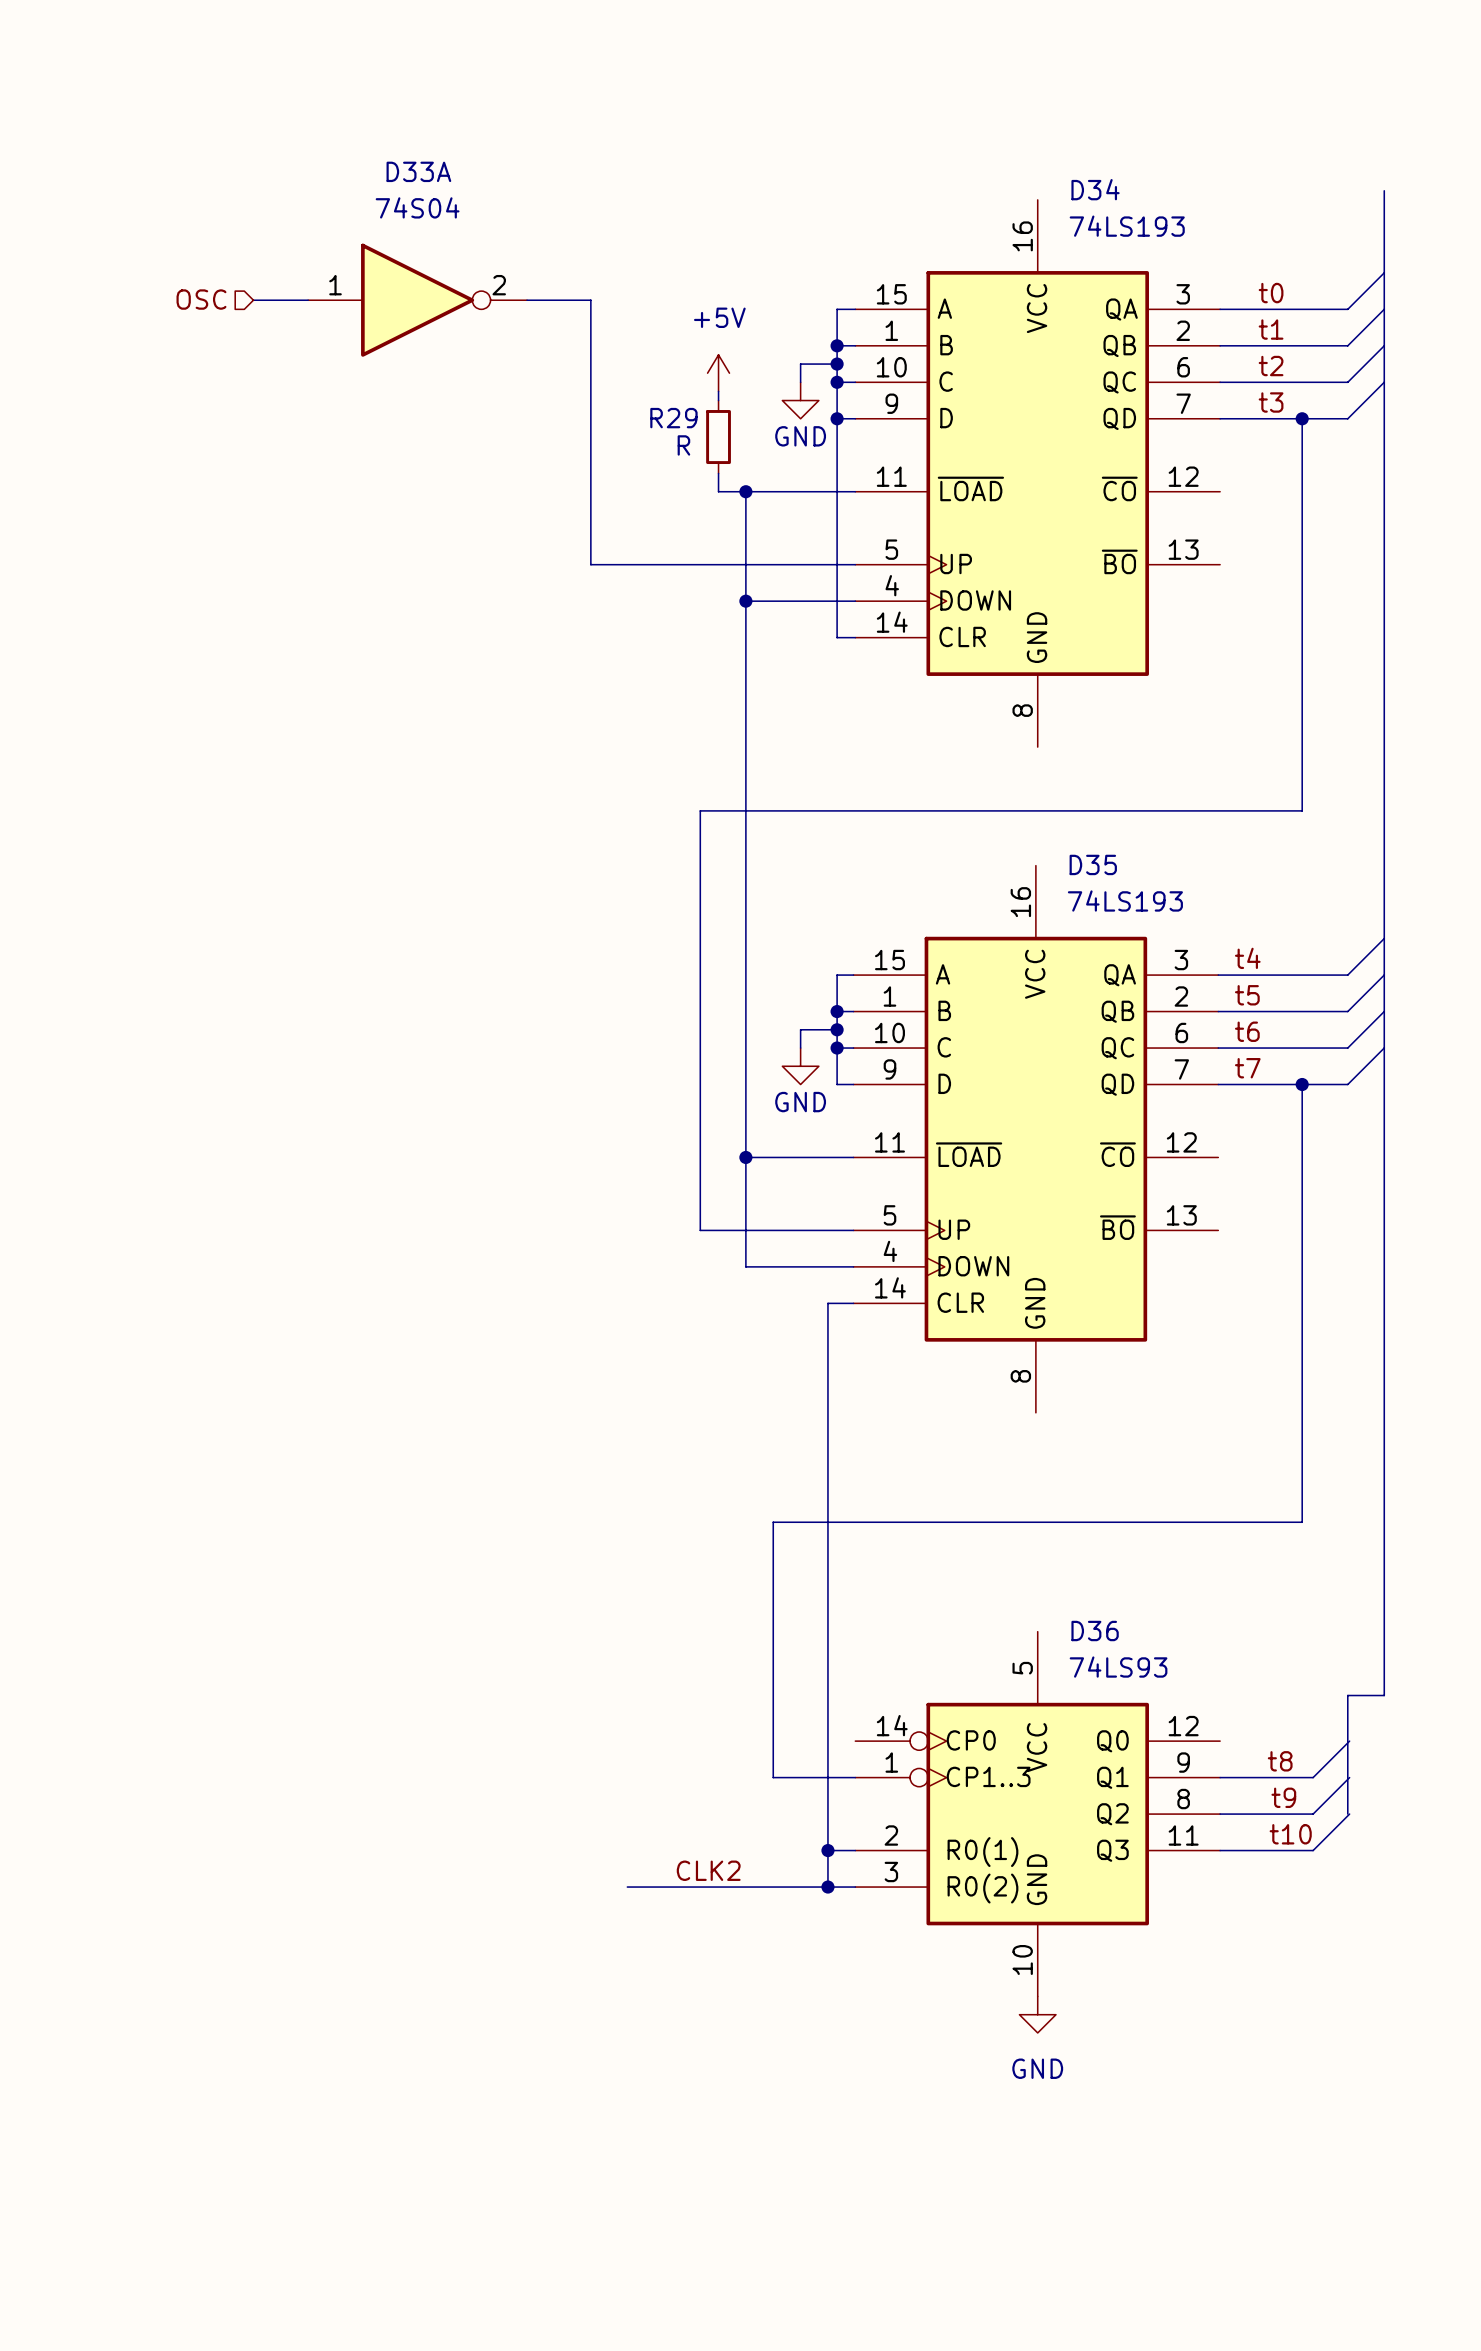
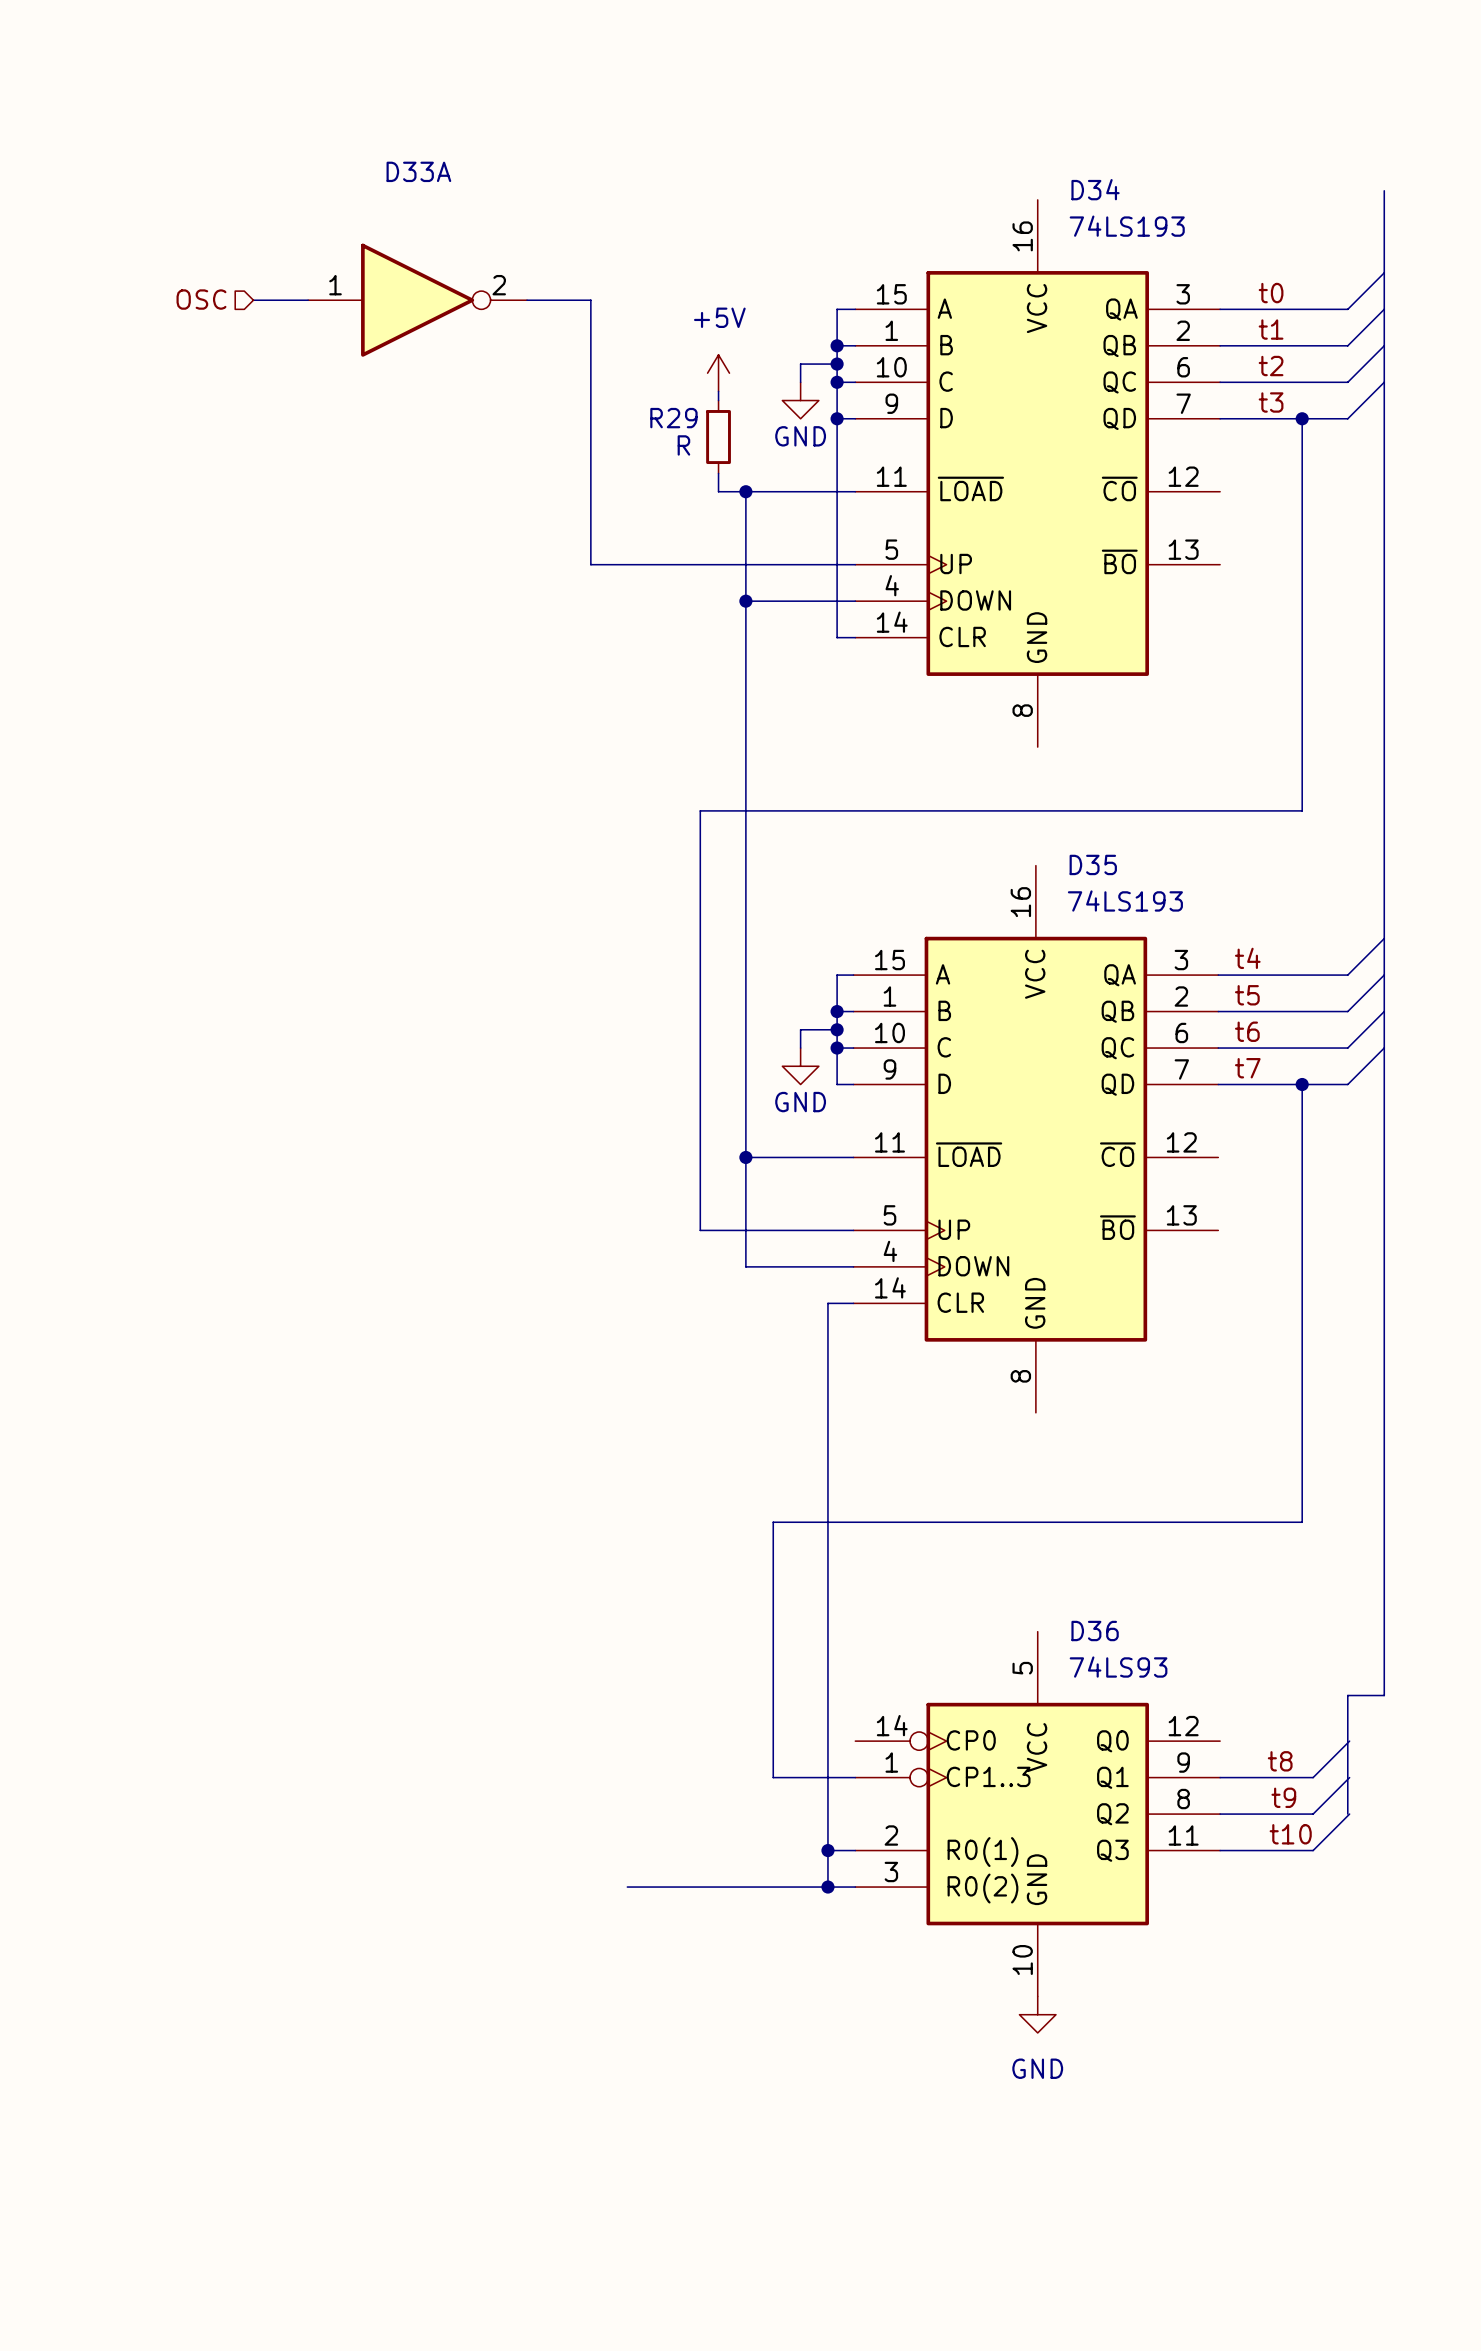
D33A value: 74S04 (417, 207) -> none
label: CLK2 (708, 1870) -> none

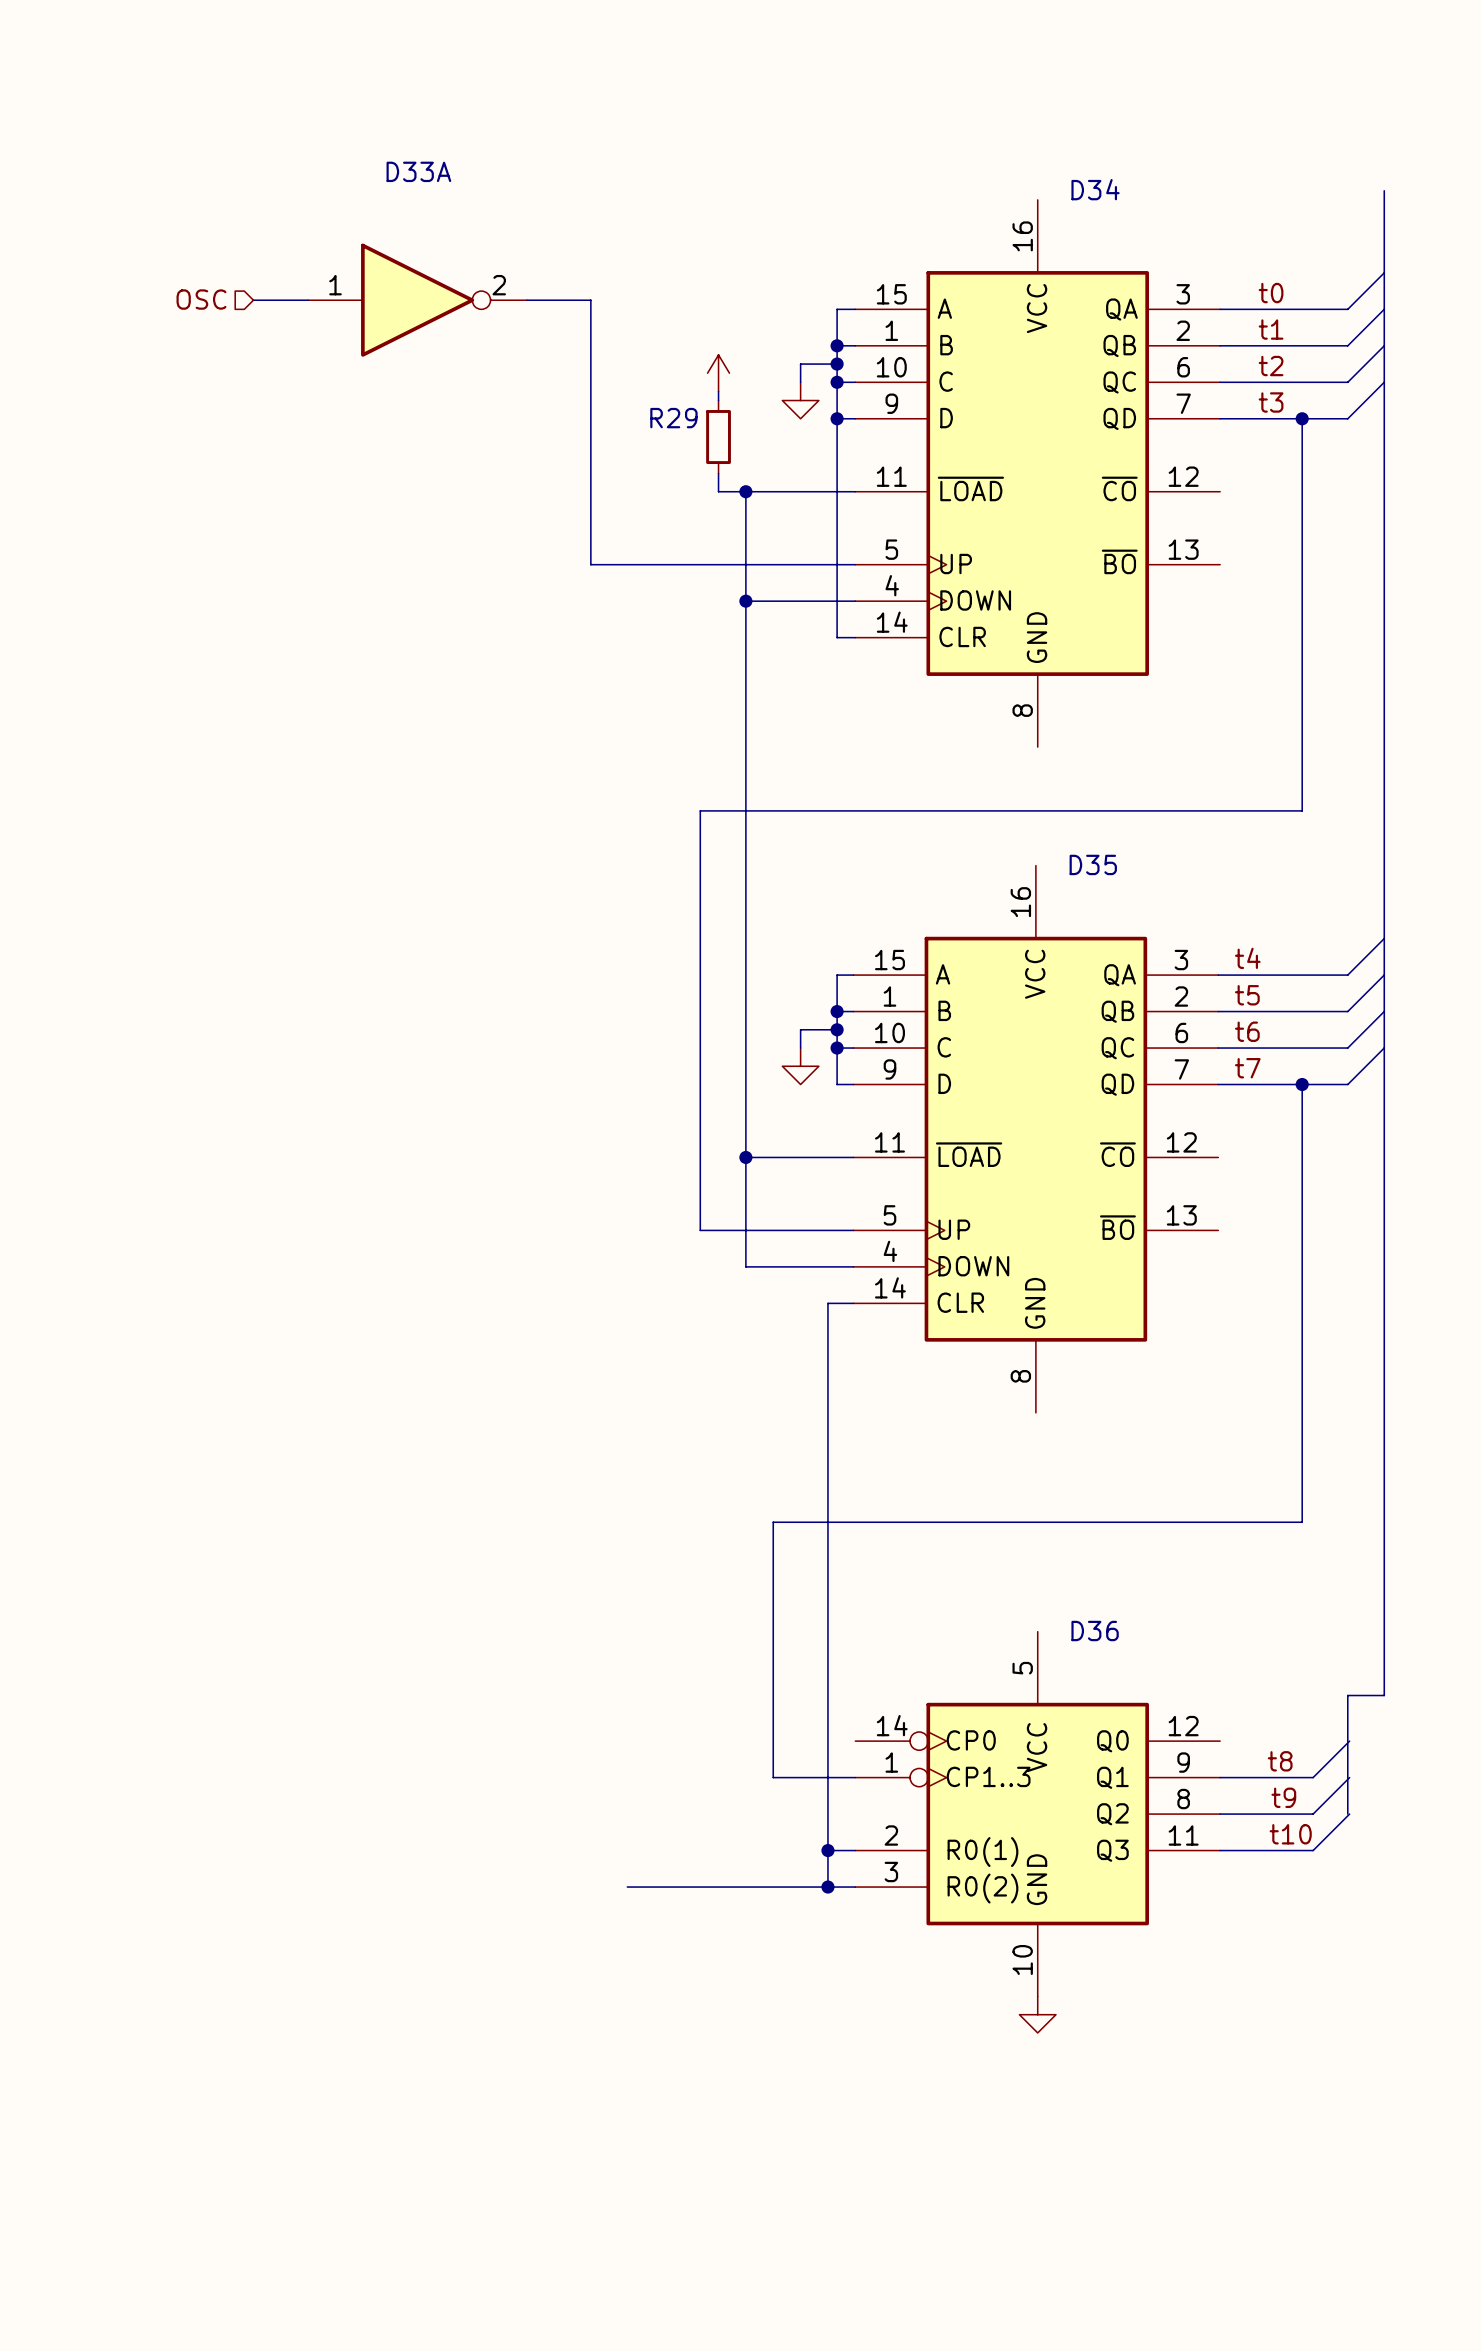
D34 value: 74LS193 (1127, 226) -> none
power symbol text: +5V (719, 317) -> none
power symbol text: GND (800, 436) -> none
R29 value: R (683, 445) -> none
D35 value: 74LS193 (1125, 901) -> none
power symbol text: GND (800, 1102) -> none
D36 value: 74LS93 (1118, 1667) -> none
power symbol text: GND (1037, 2068) -> none

